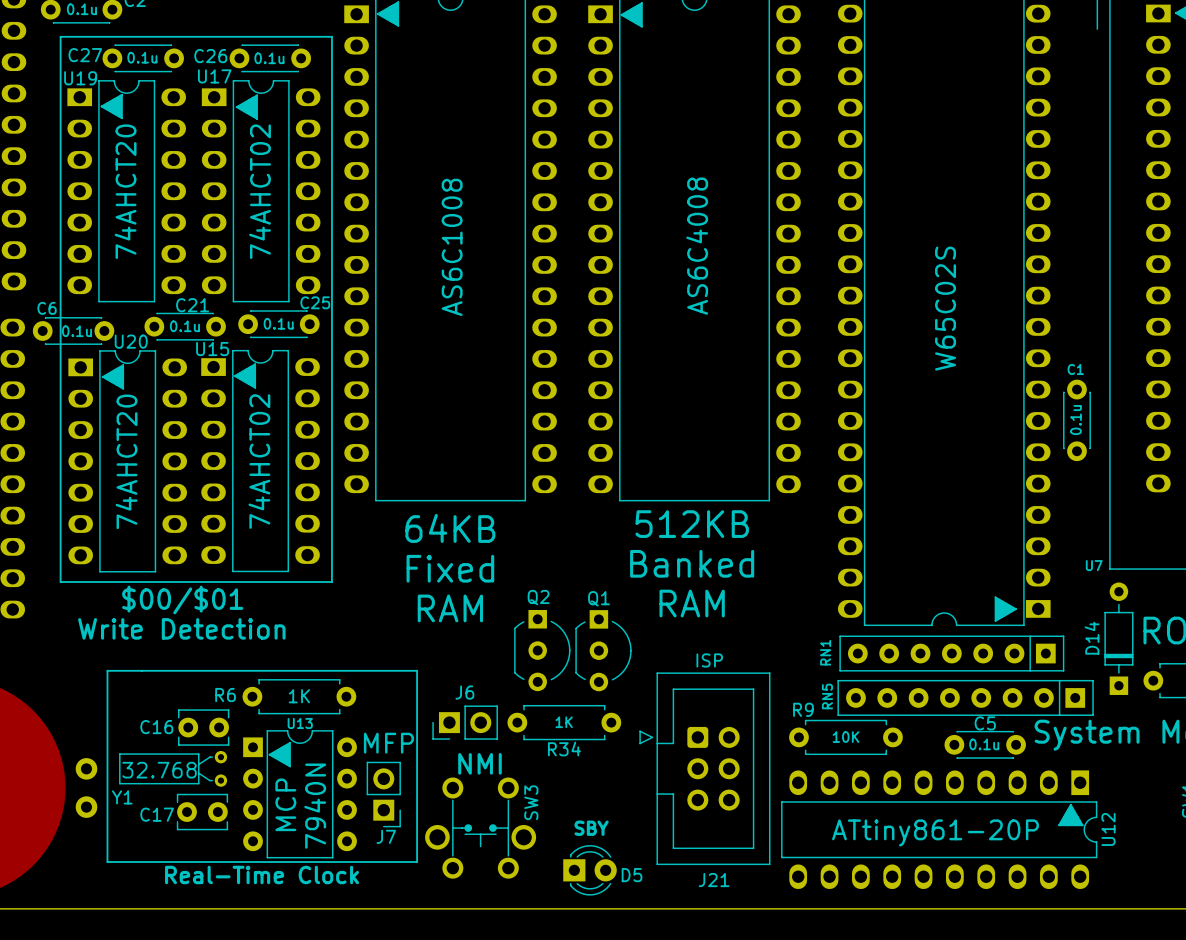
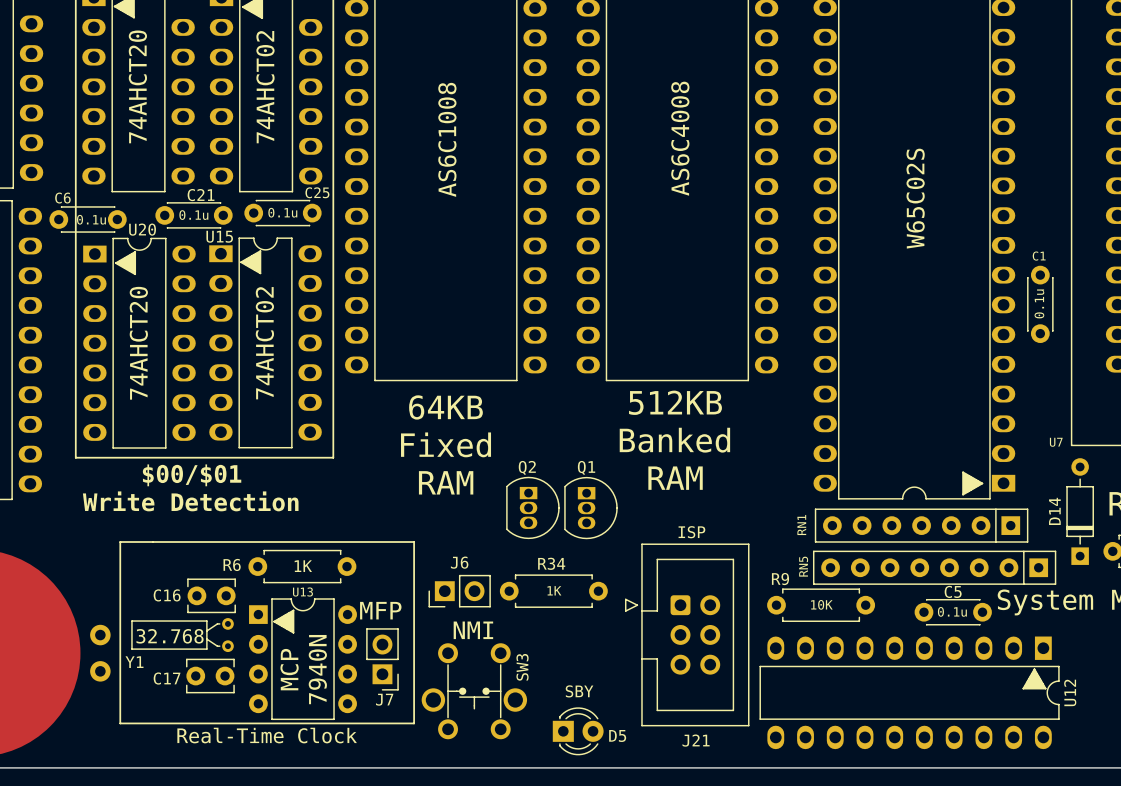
Q2 footprint: [514, 609, 571, 692] -> [506, 476, 560, 540]
Q1 footprint: [575, 610, 632, 692] -> [564, 476, 618, 540]
R34 name position: R34 (564, 748) -> R34 (551, 563)
U12 value: ATtiny861-20P (935, 832) -> none

